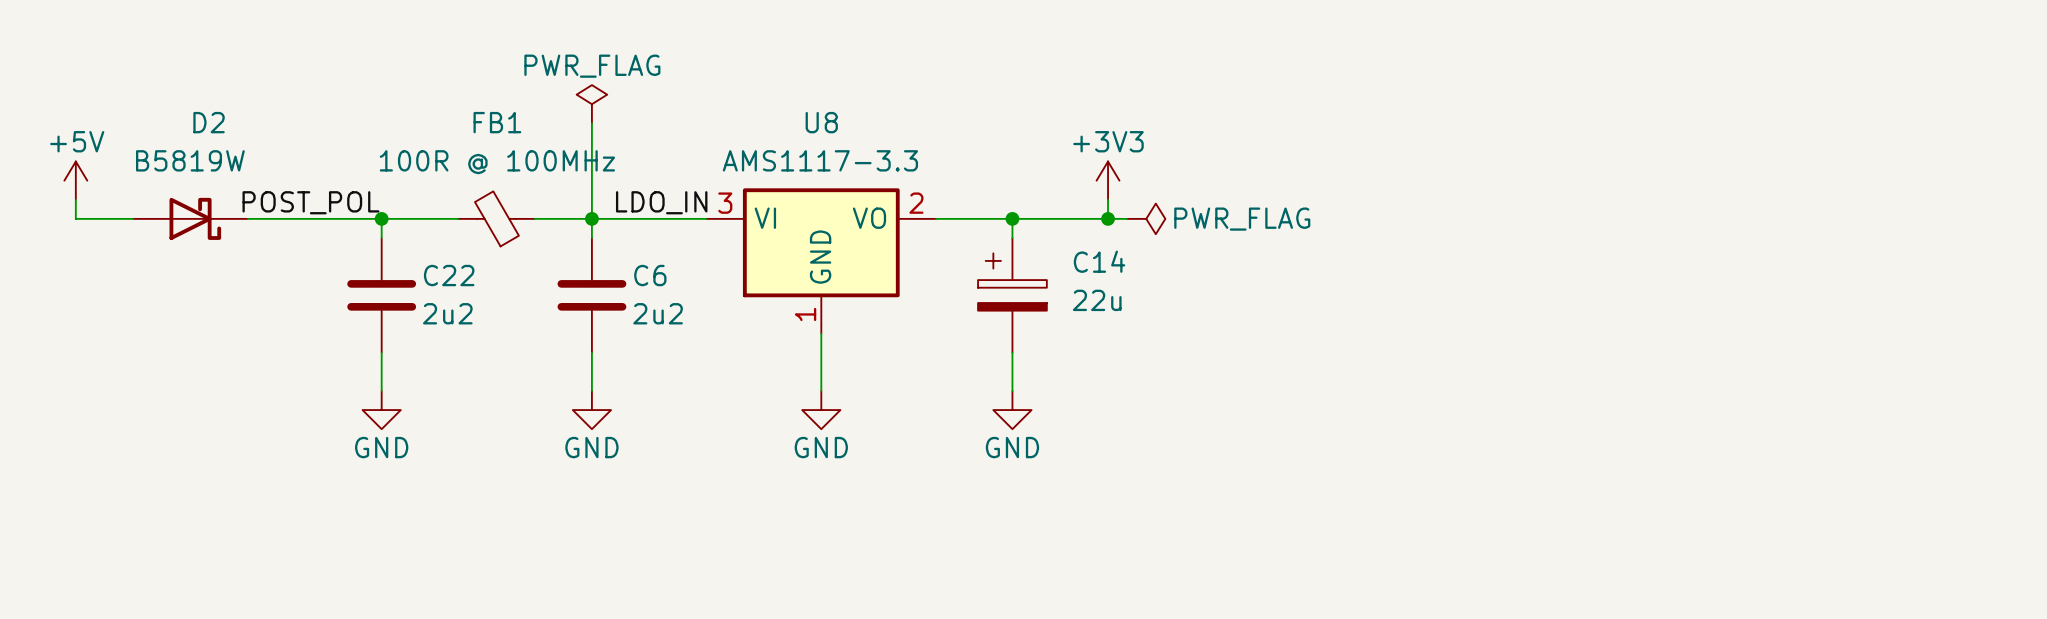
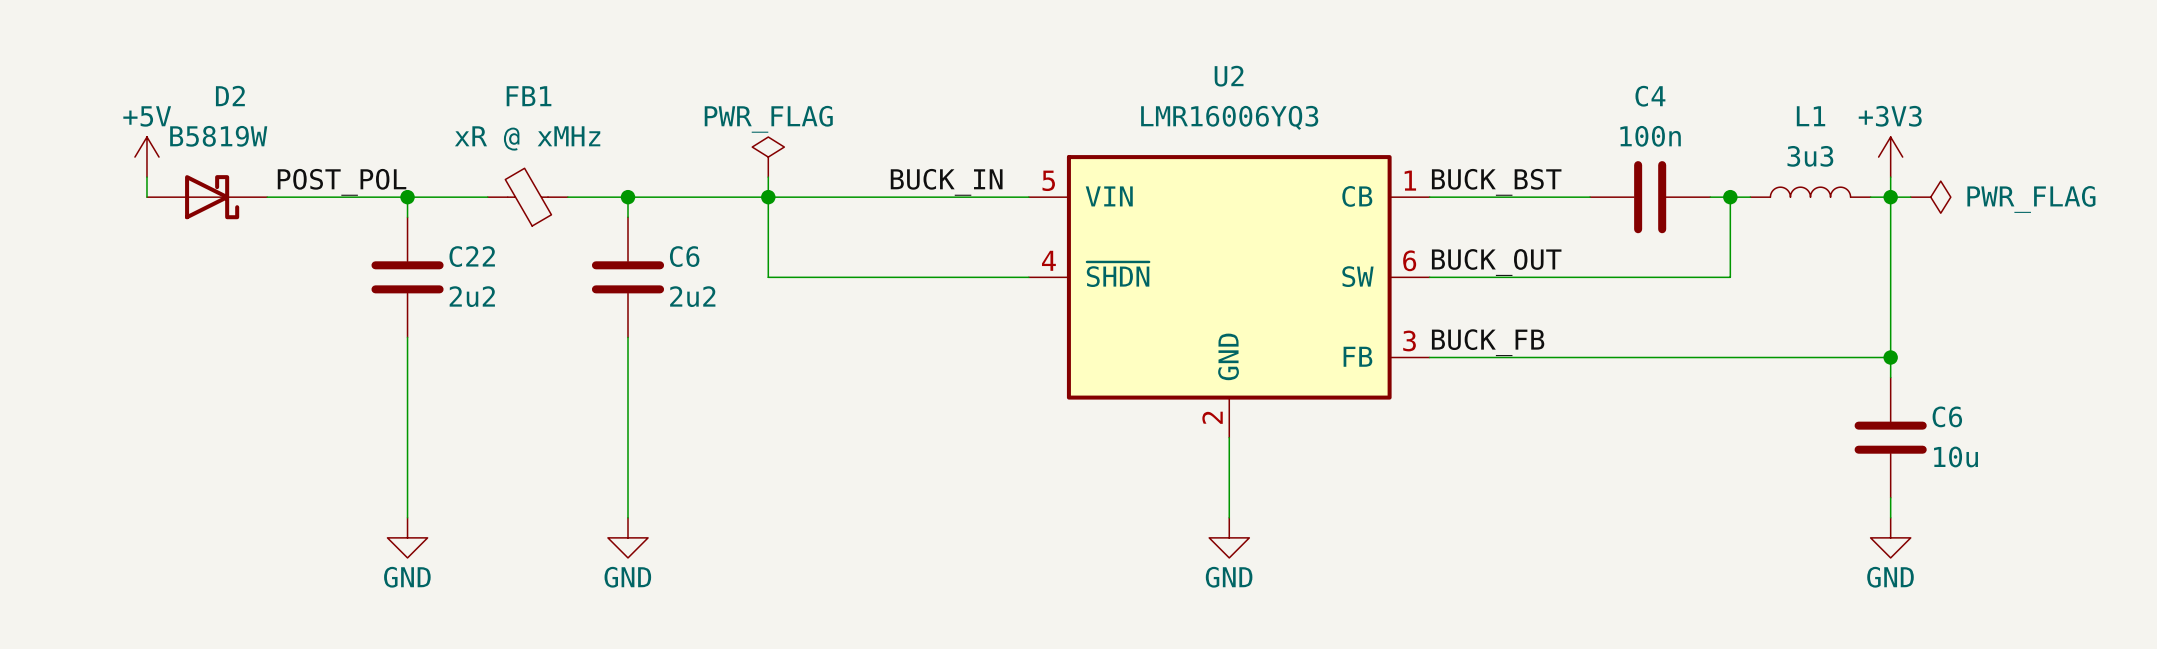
power symbol position: PWR_FLAG (591, 104) -> PWR_FLAG (768, 157)
wire: (591, 123) (591, 218) -> none
FB1 value: 100R @ 100MHz (497, 162) -> xR @ xMHz (527, 138)
power symbol position: +5V (75, 180) -> +5V (146, 157)
power symbol: +3V3 (1108, 180) -> none
power symbol: none -> +3V3 (1890, 157)
wire: (75, 199) (75, 218) (133, 218) -> (146, 177) (146, 197)
wire: none -> (768, 177) (768, 277) (1028, 277)
wire: none -> (1890, 177) (1890, 377)
label: LDO_IN (661, 202) -> none
label: none -> BUCK_IN (946, 182)
label: none -> BUCK_BST (1496, 182)
L1: none -> 3u3 (1810, 192)
junction: none -> (768, 197)
junction: (1012, 218) -> none
junction: (1108, 218) -> none
power symbol: PWR_FLAG (1146, 218) -> none
wire: none -> (1429, 197) (1590, 197)
C4: none -> 100n (1650, 197)
wire: none -> (1710, 197) (1750, 197)
wire: none -> (1730, 197) (1730, 277) (1429, 277)
junction: none -> (1730, 197)
wire: none -> (1870, 197) (1910, 197)
junction: none -> (1890, 197)
power symbol: none -> PWR_FLAG (1930, 197)
U8: AMS1117-3.3 (821, 260) -> none
label: none -> BUCK_OUT (1496, 262)
C14: 22u (1012, 295) -> none
U2: none -> LMR16006YQ3 (1229, 296)
wire: (821, 333) (821, 390) -> none
label: none -> BUCK_FB (1488, 342)
wire: none -> (1429, 357) (1890, 357)
junction: none -> (1890, 357)
wire: none -> (407, 377) (407, 517)
wire: none -> (628, 377) (628, 517)
power symbol: GND (381, 410) -> none
power symbol: GND (591, 410) -> none
power symbol: GND (821, 410) -> none
power symbol: GND (1012, 410) -> none
wire: none -> (1229, 437) (1229, 517)
C6: none -> 10u (1890, 437)
wire: none -> (1890, 497) (1890, 517)
power symbol: none -> GND (407, 537)
power symbol: none -> GND (628, 537)
power symbol: none -> GND (1229, 537)
power symbol: none -> GND (1890, 537)

